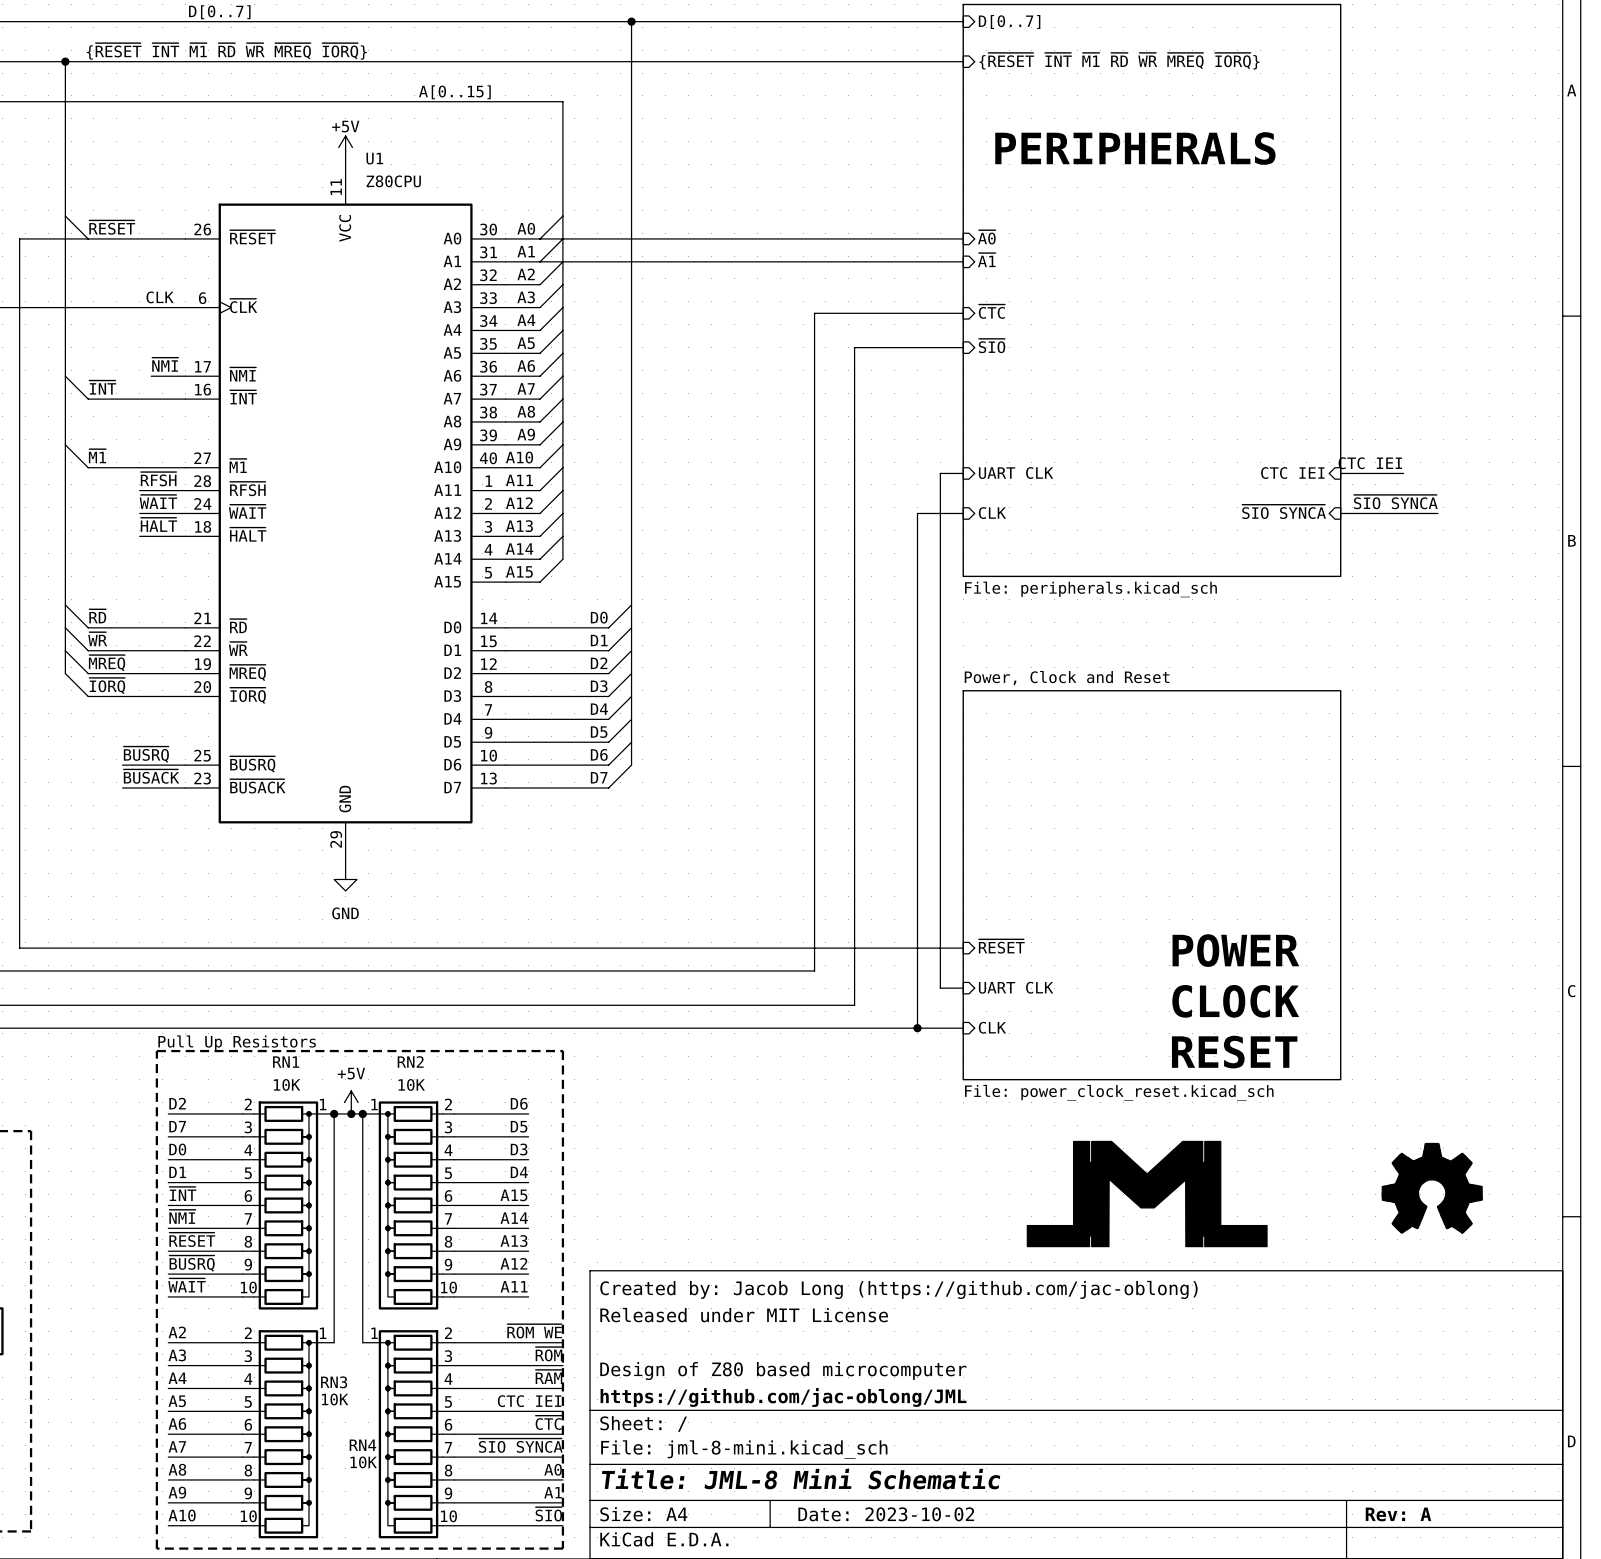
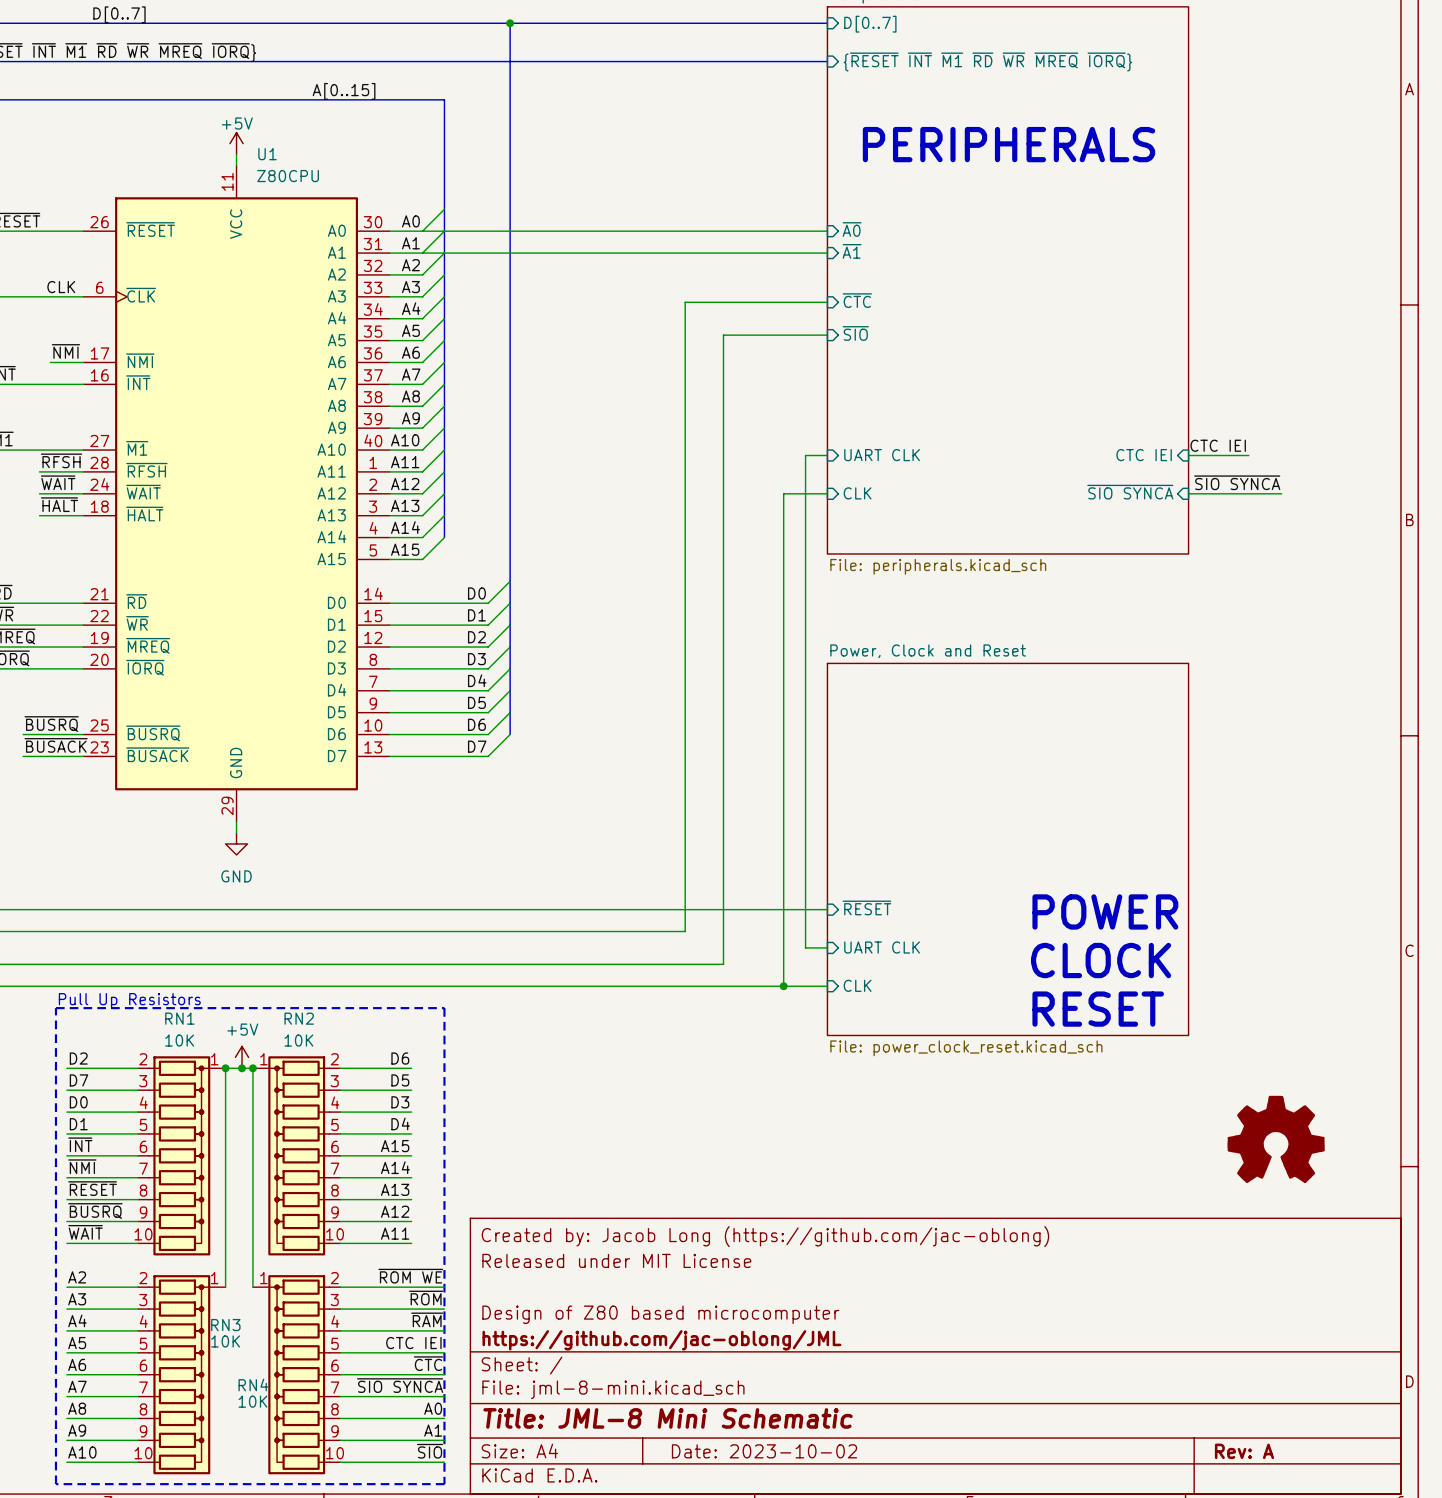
drawing: [1027, 1141, 1268, 1247] -> none

